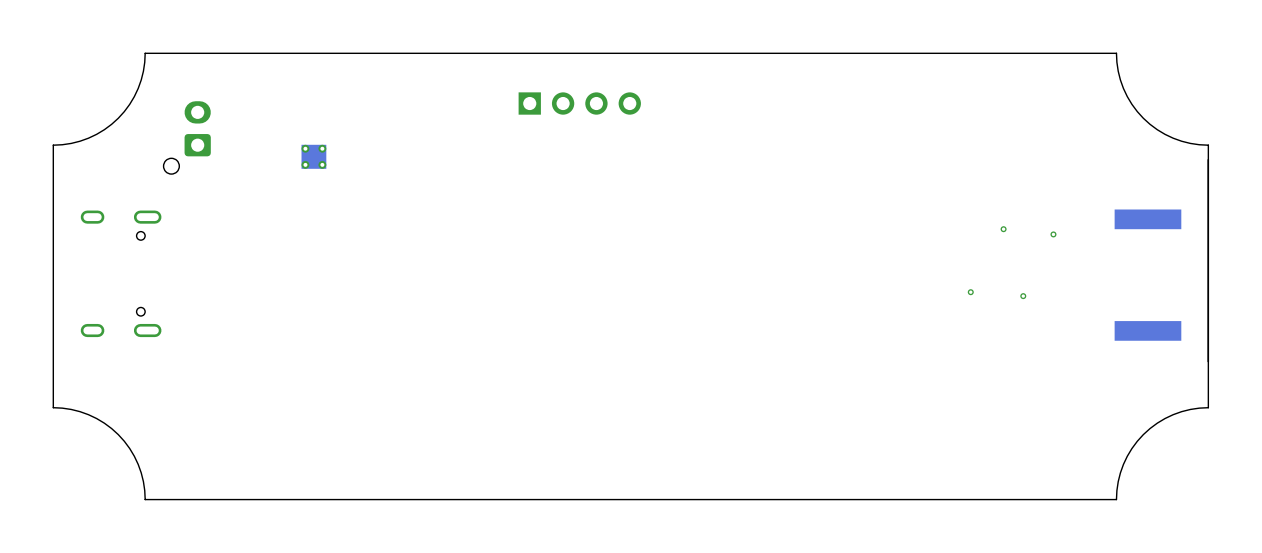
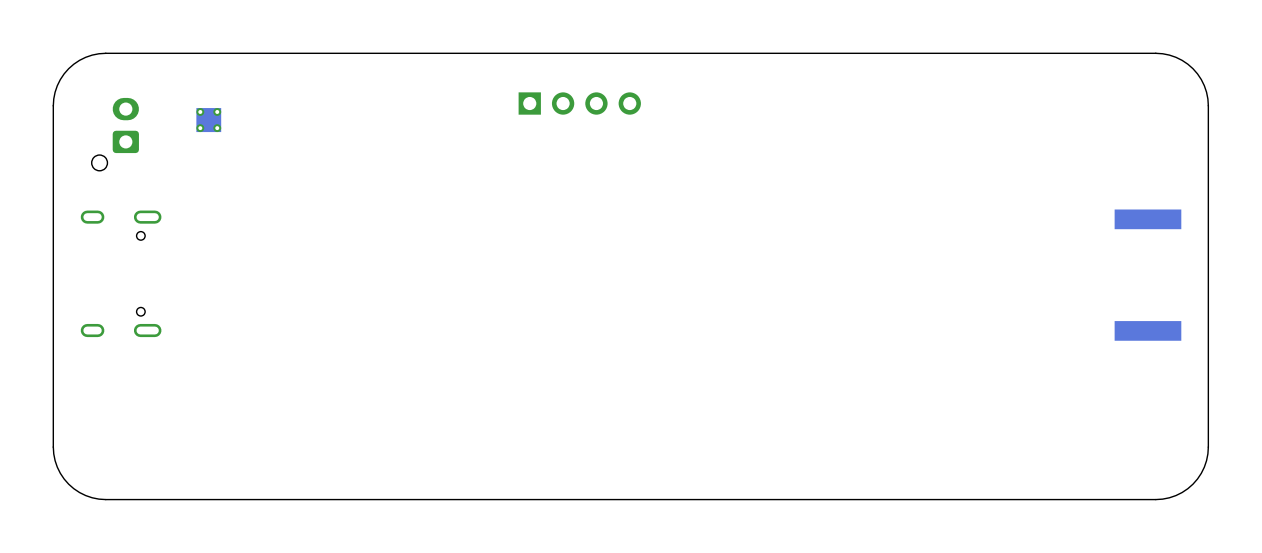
drawing shape: [52, 52, 1210, 501] -> [52, 52, 1210, 501]
part position: (187, 137) -> (115, 134)
part position: (313, 156) -> (208, 120)
via: (1003, 229) -> none
via: (1053, 234) -> none
via: (970, 292) -> none
via: (1023, 296) -> none

